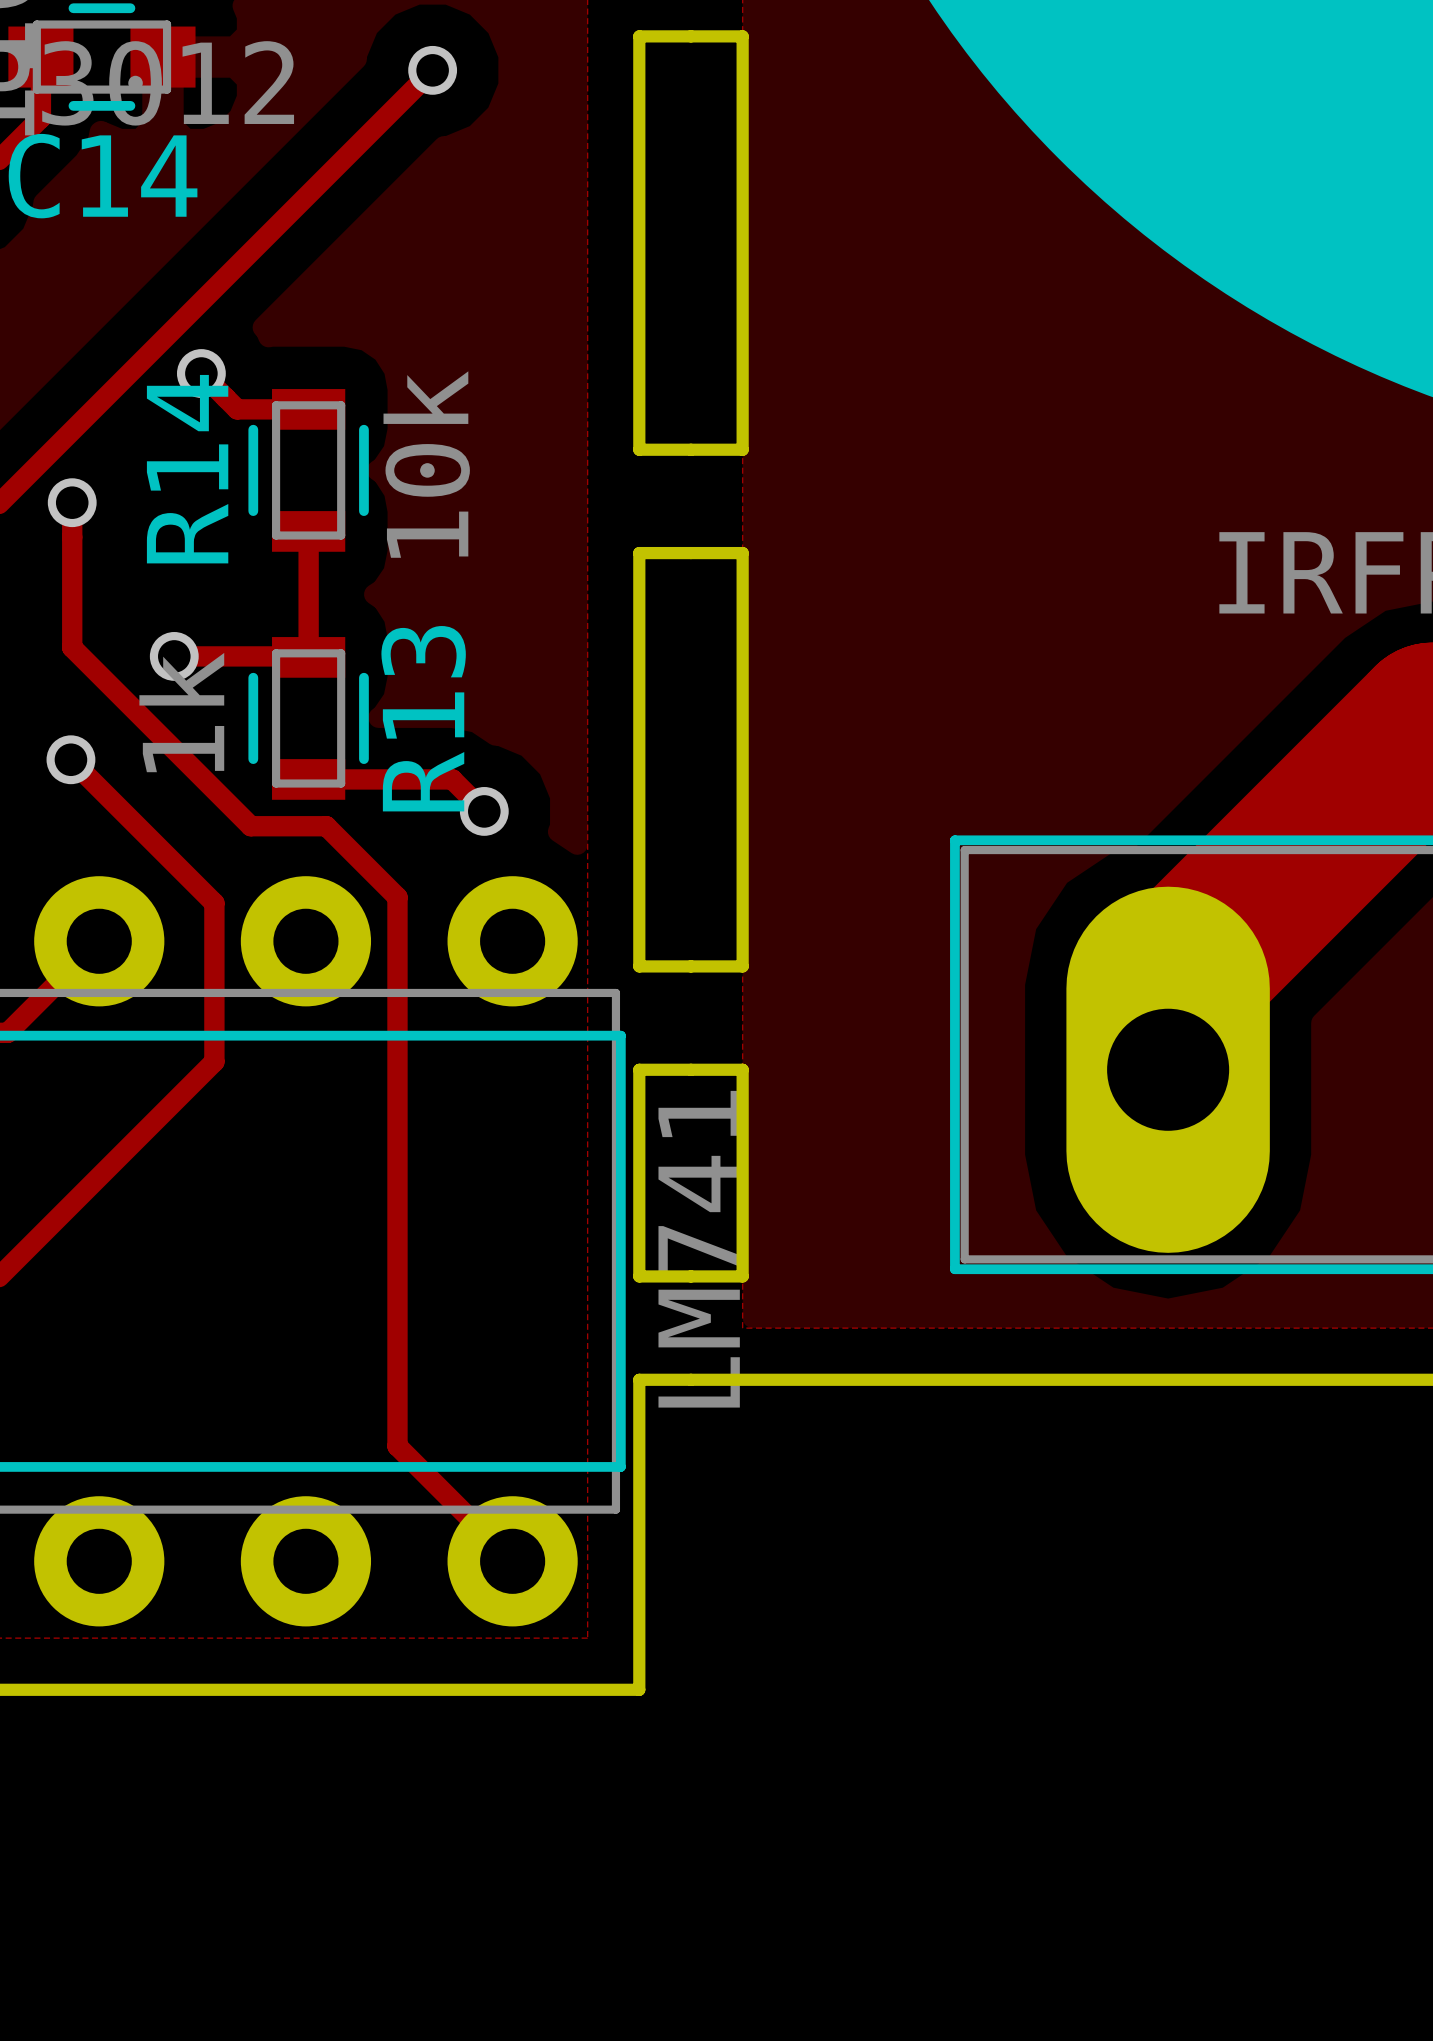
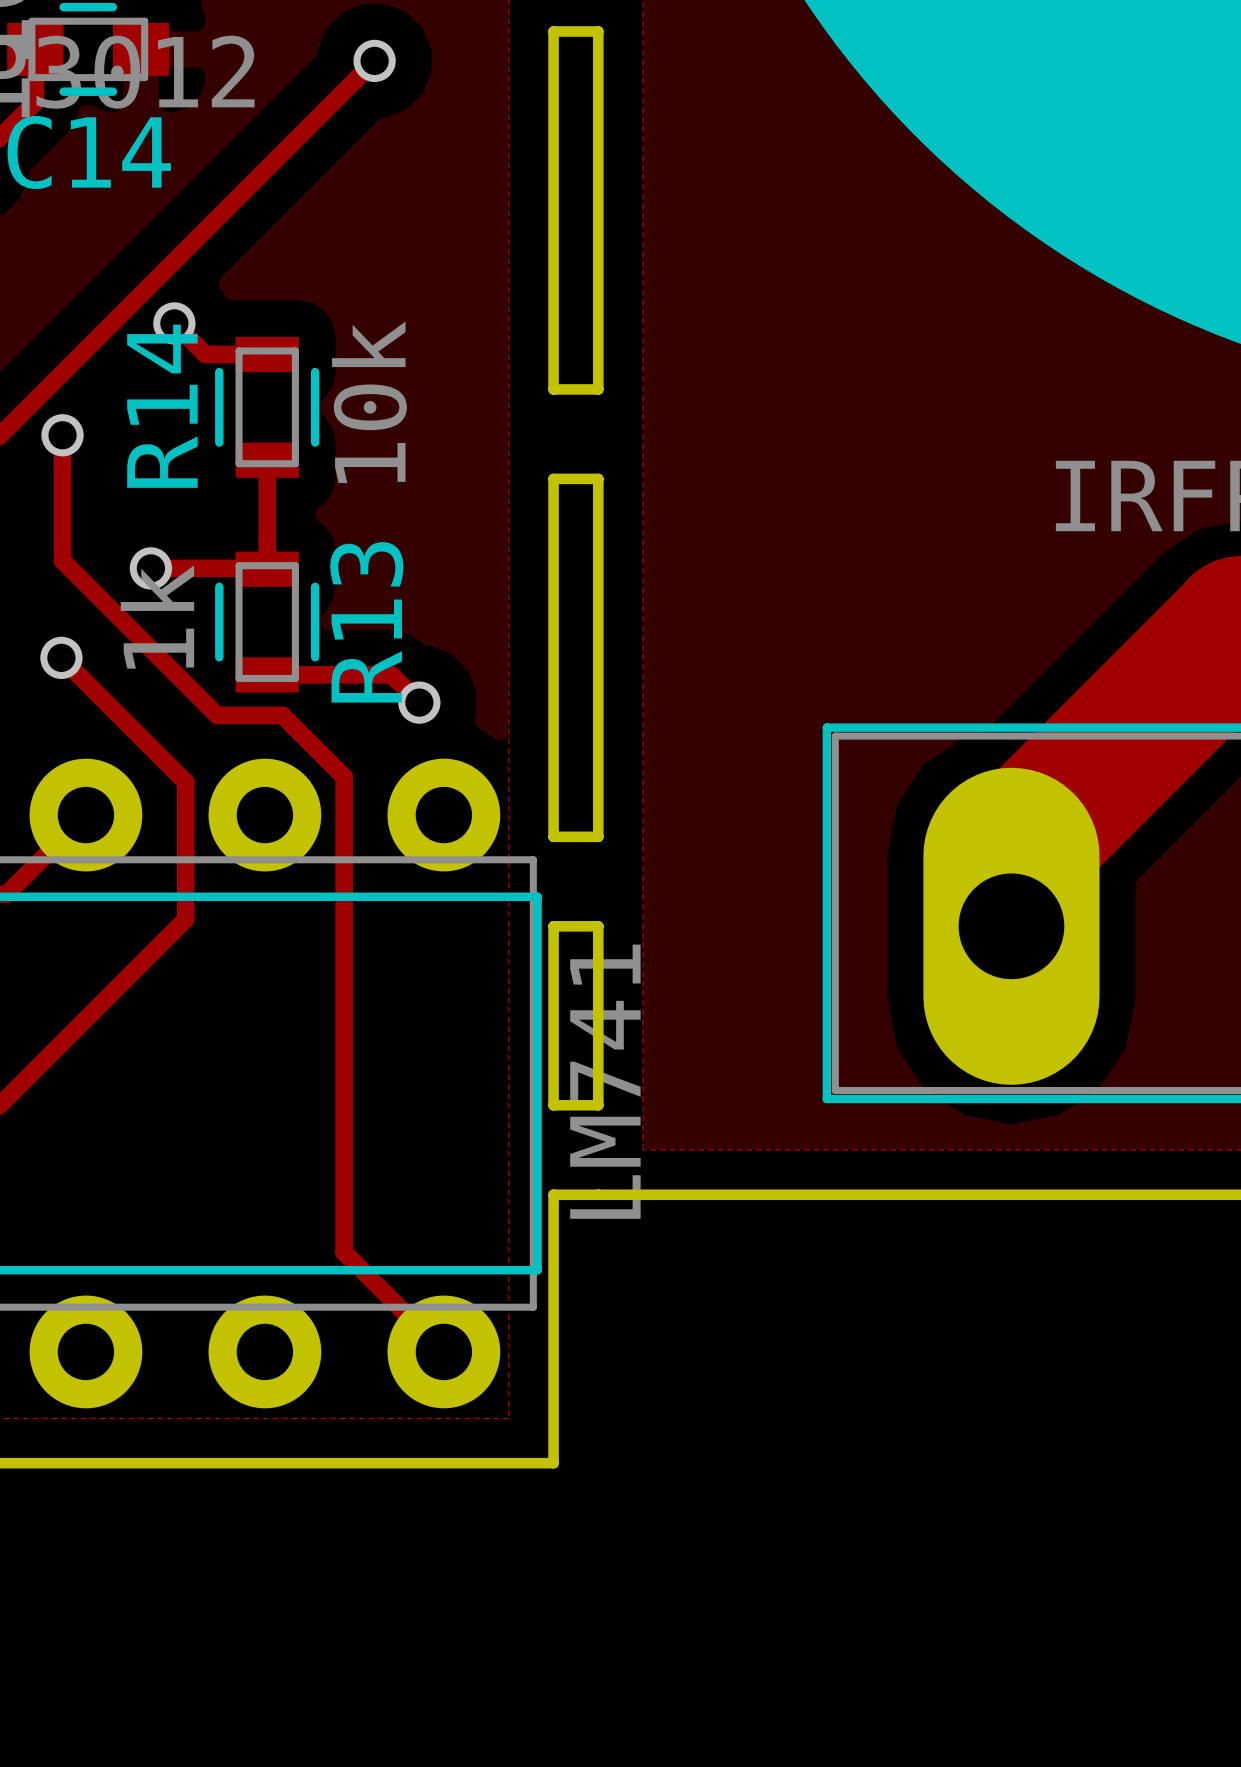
board edge: (690, 36) (742, 36) (742, 449) (690, 449) -> (598, 31) (598, 389)
board edge: (690, 553) (742, 553) (742, 966) (690, 966) -> (598, 478) (598, 836)
board edge: (690, 1069) (742, 1069) (742, 1276) (690, 1276) -> (598, 926) (598, 1105)

